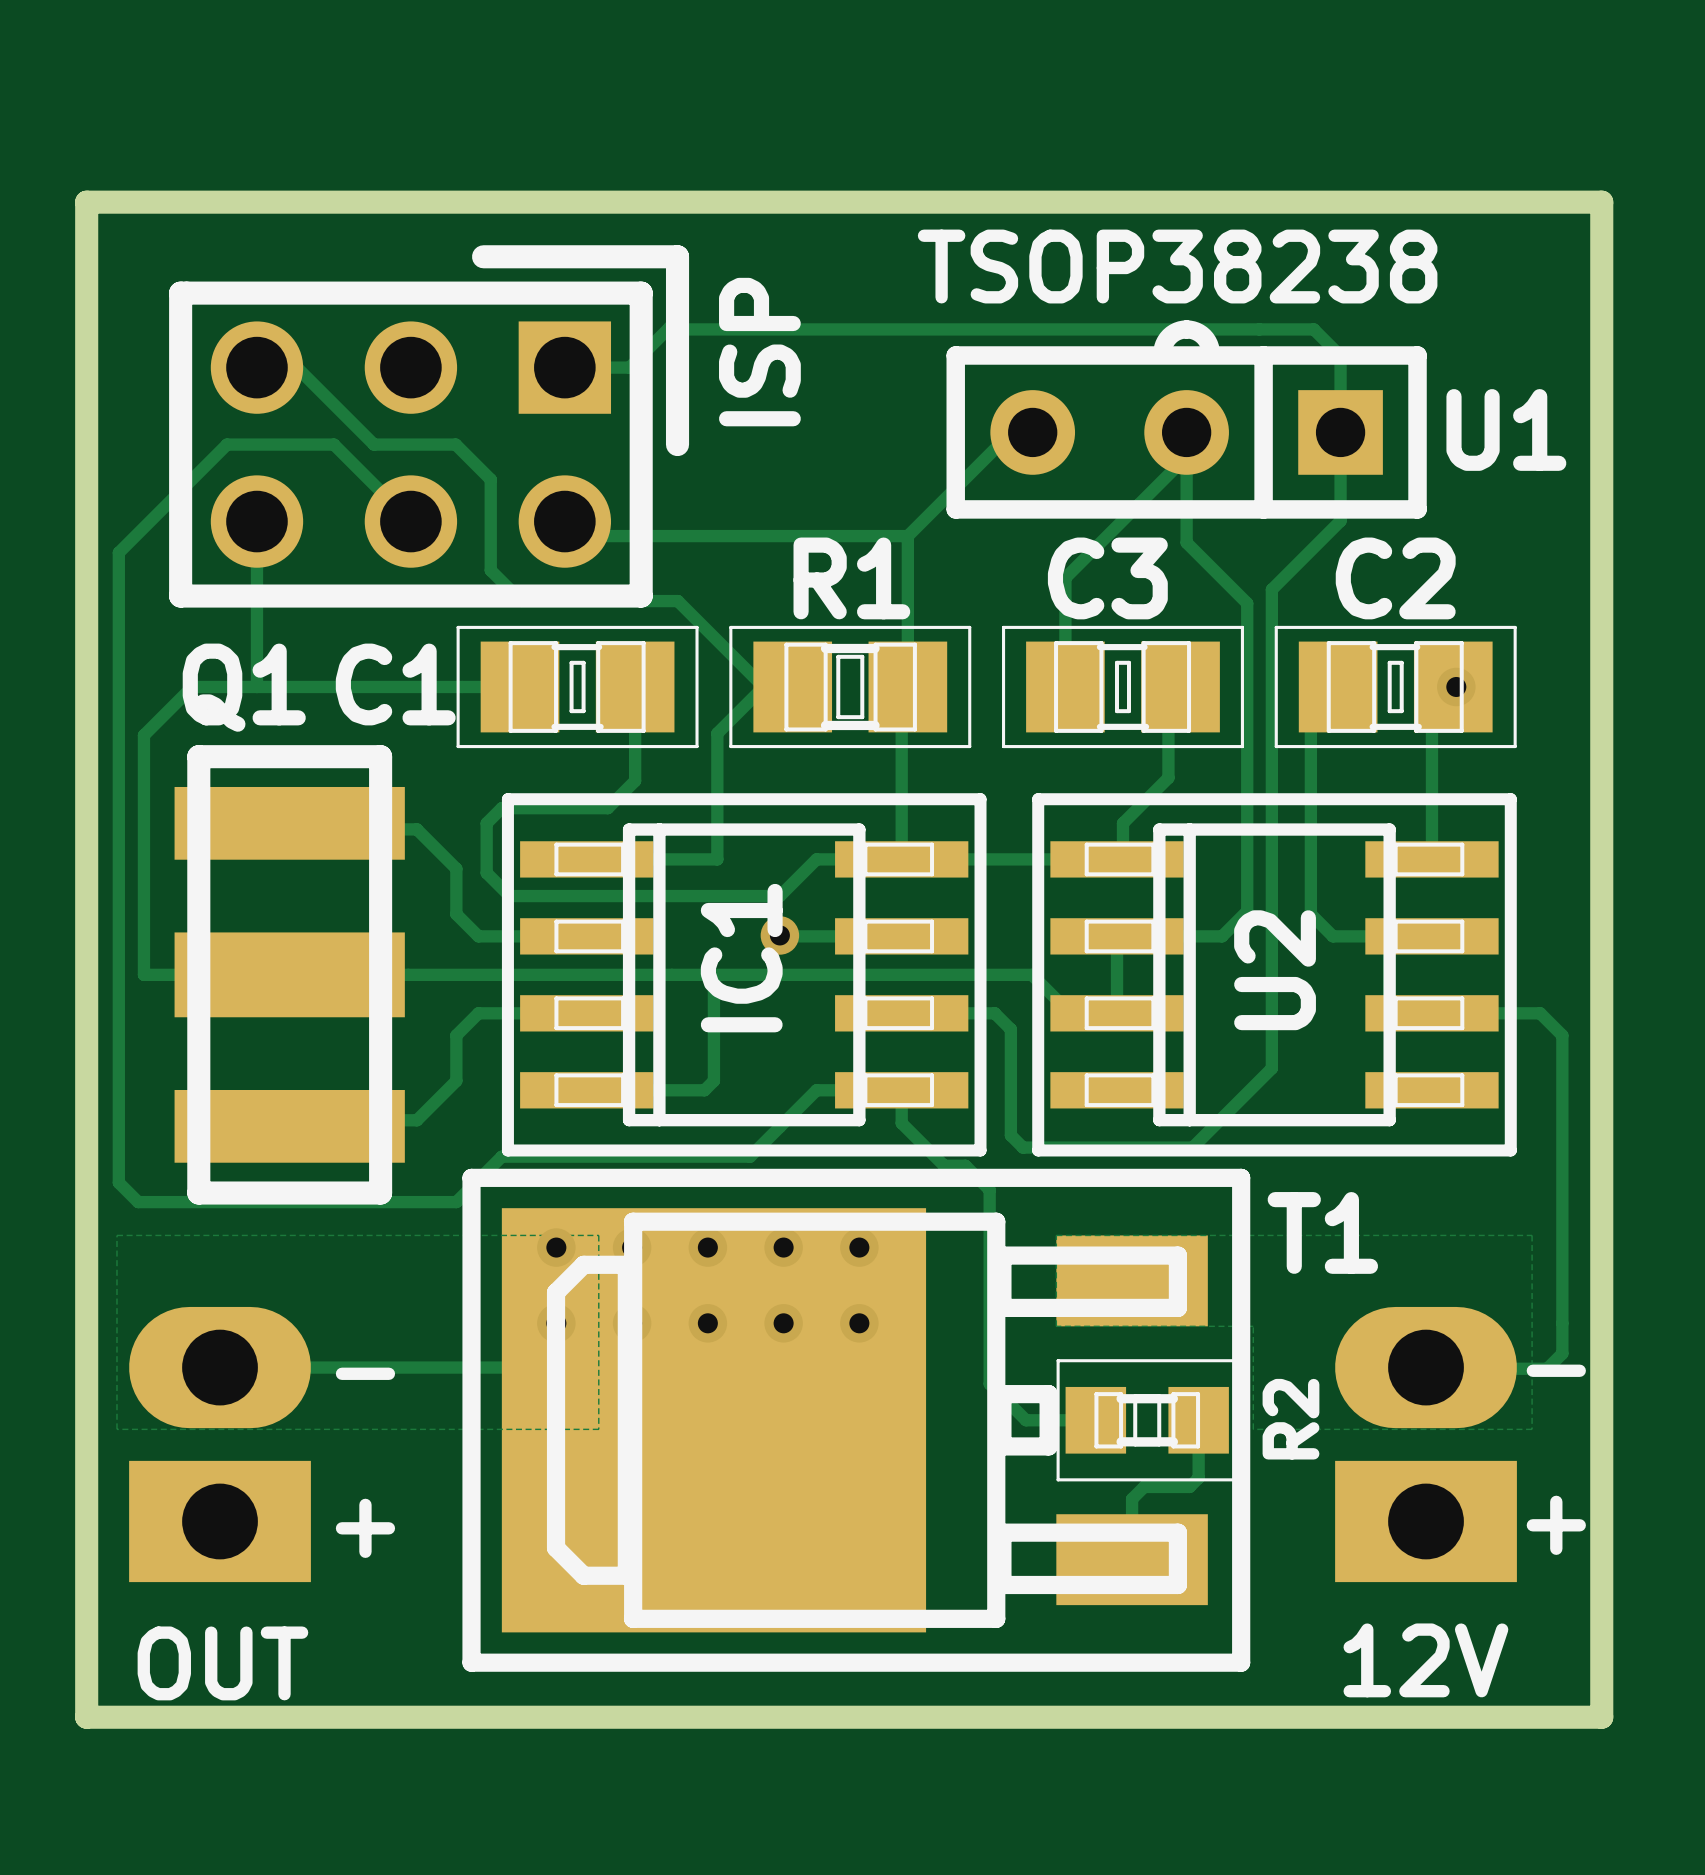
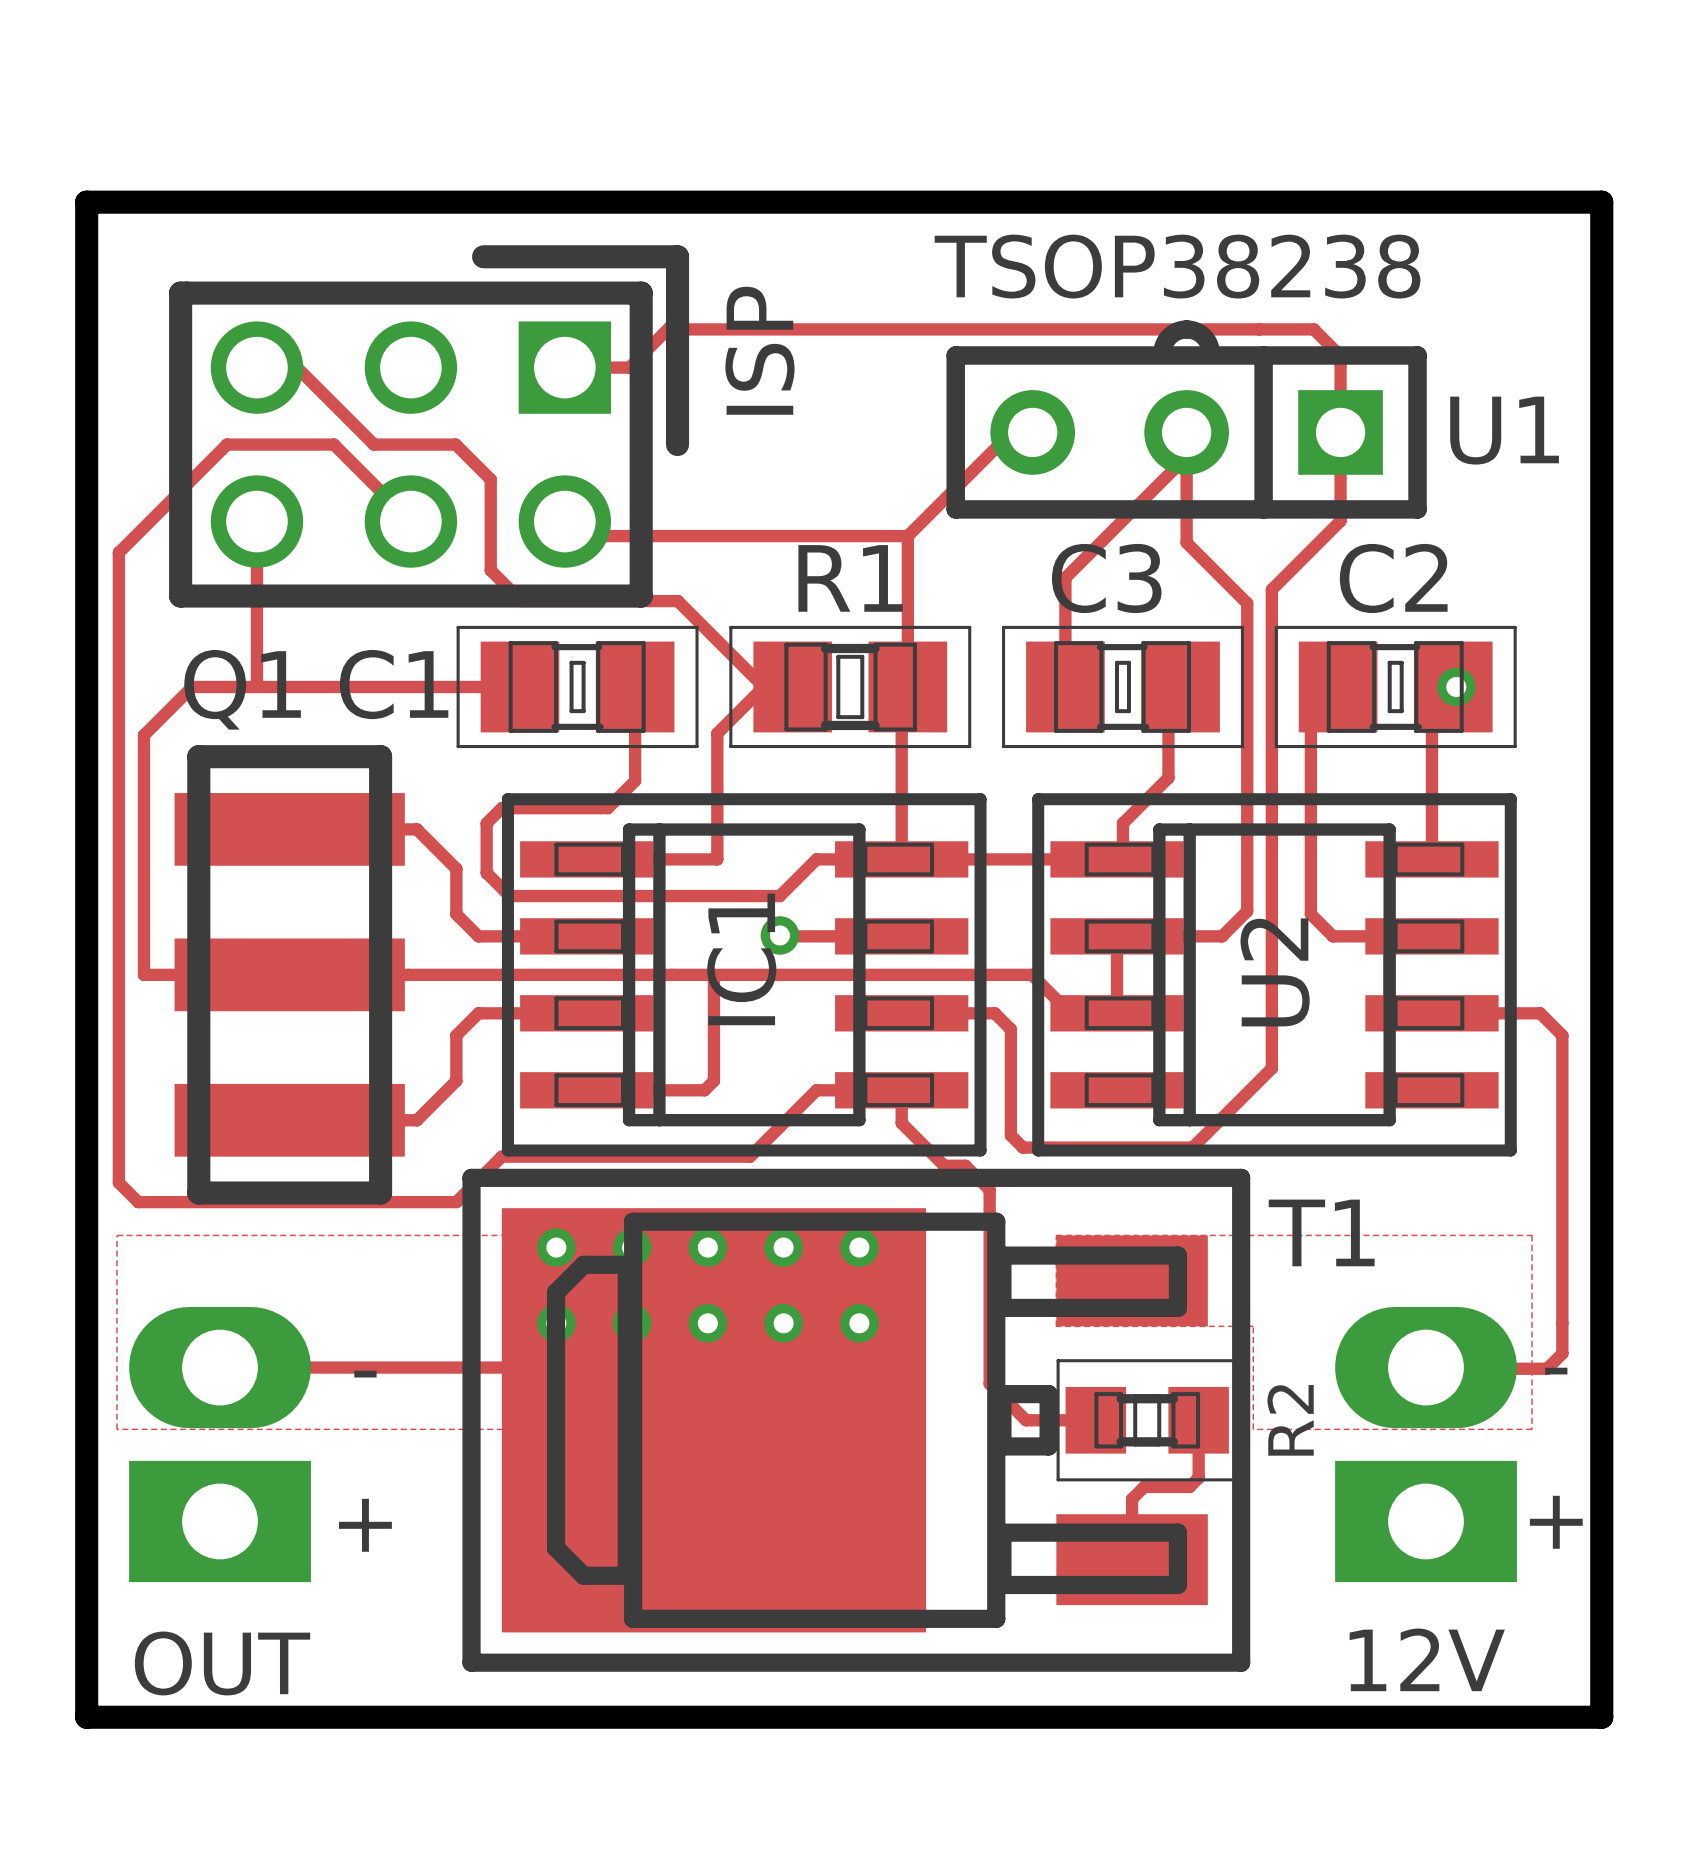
Q1 footprint: [174, 745, 405, 1205] -> [174, 745, 405, 1205]

